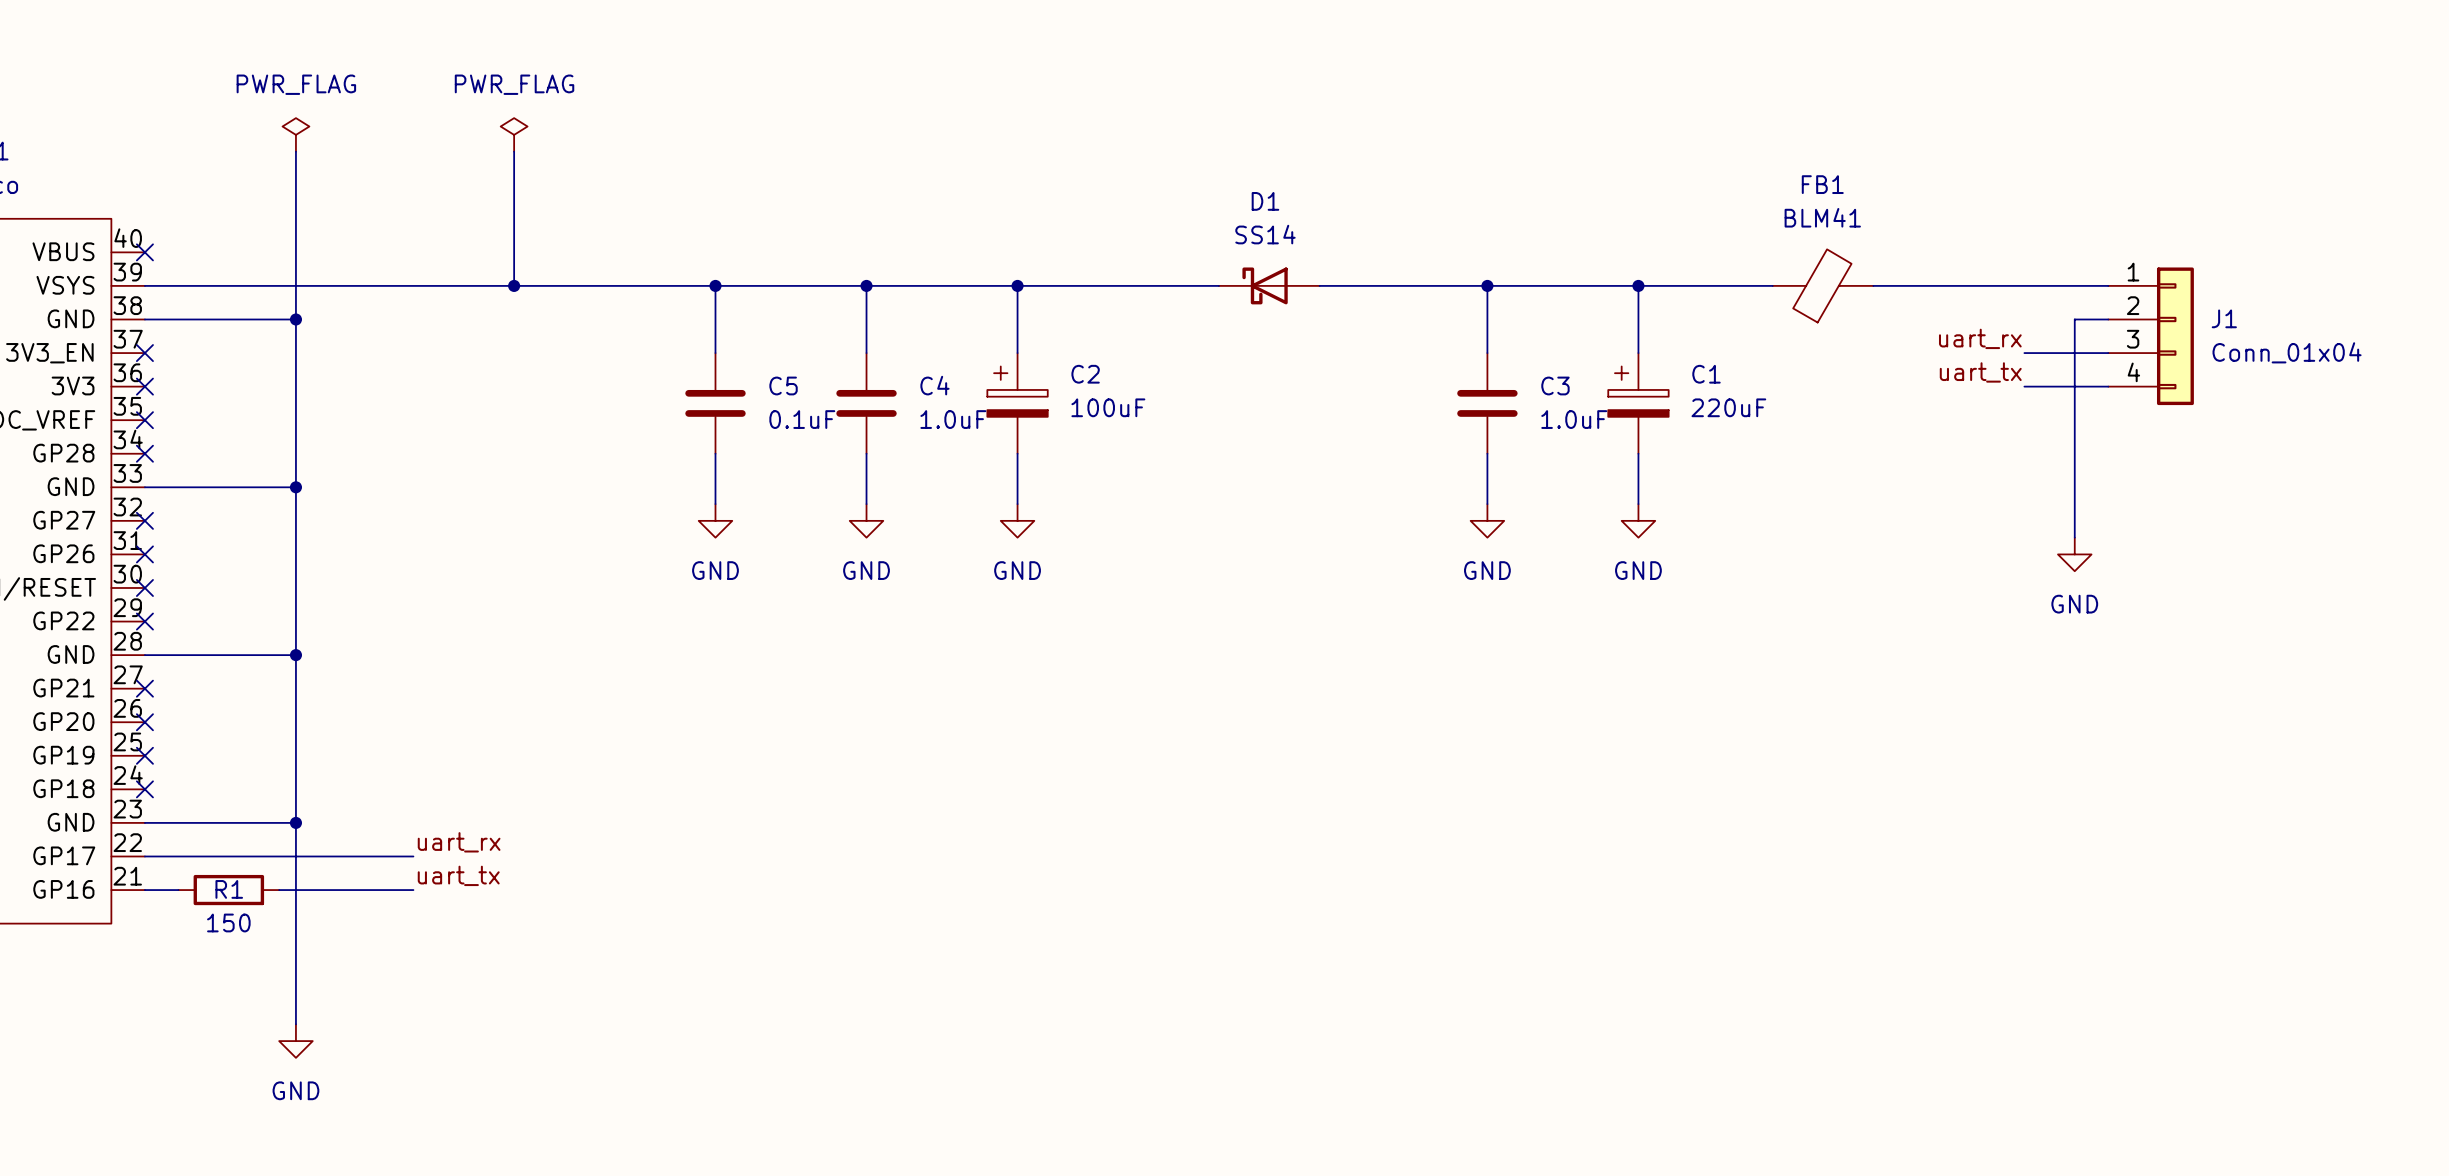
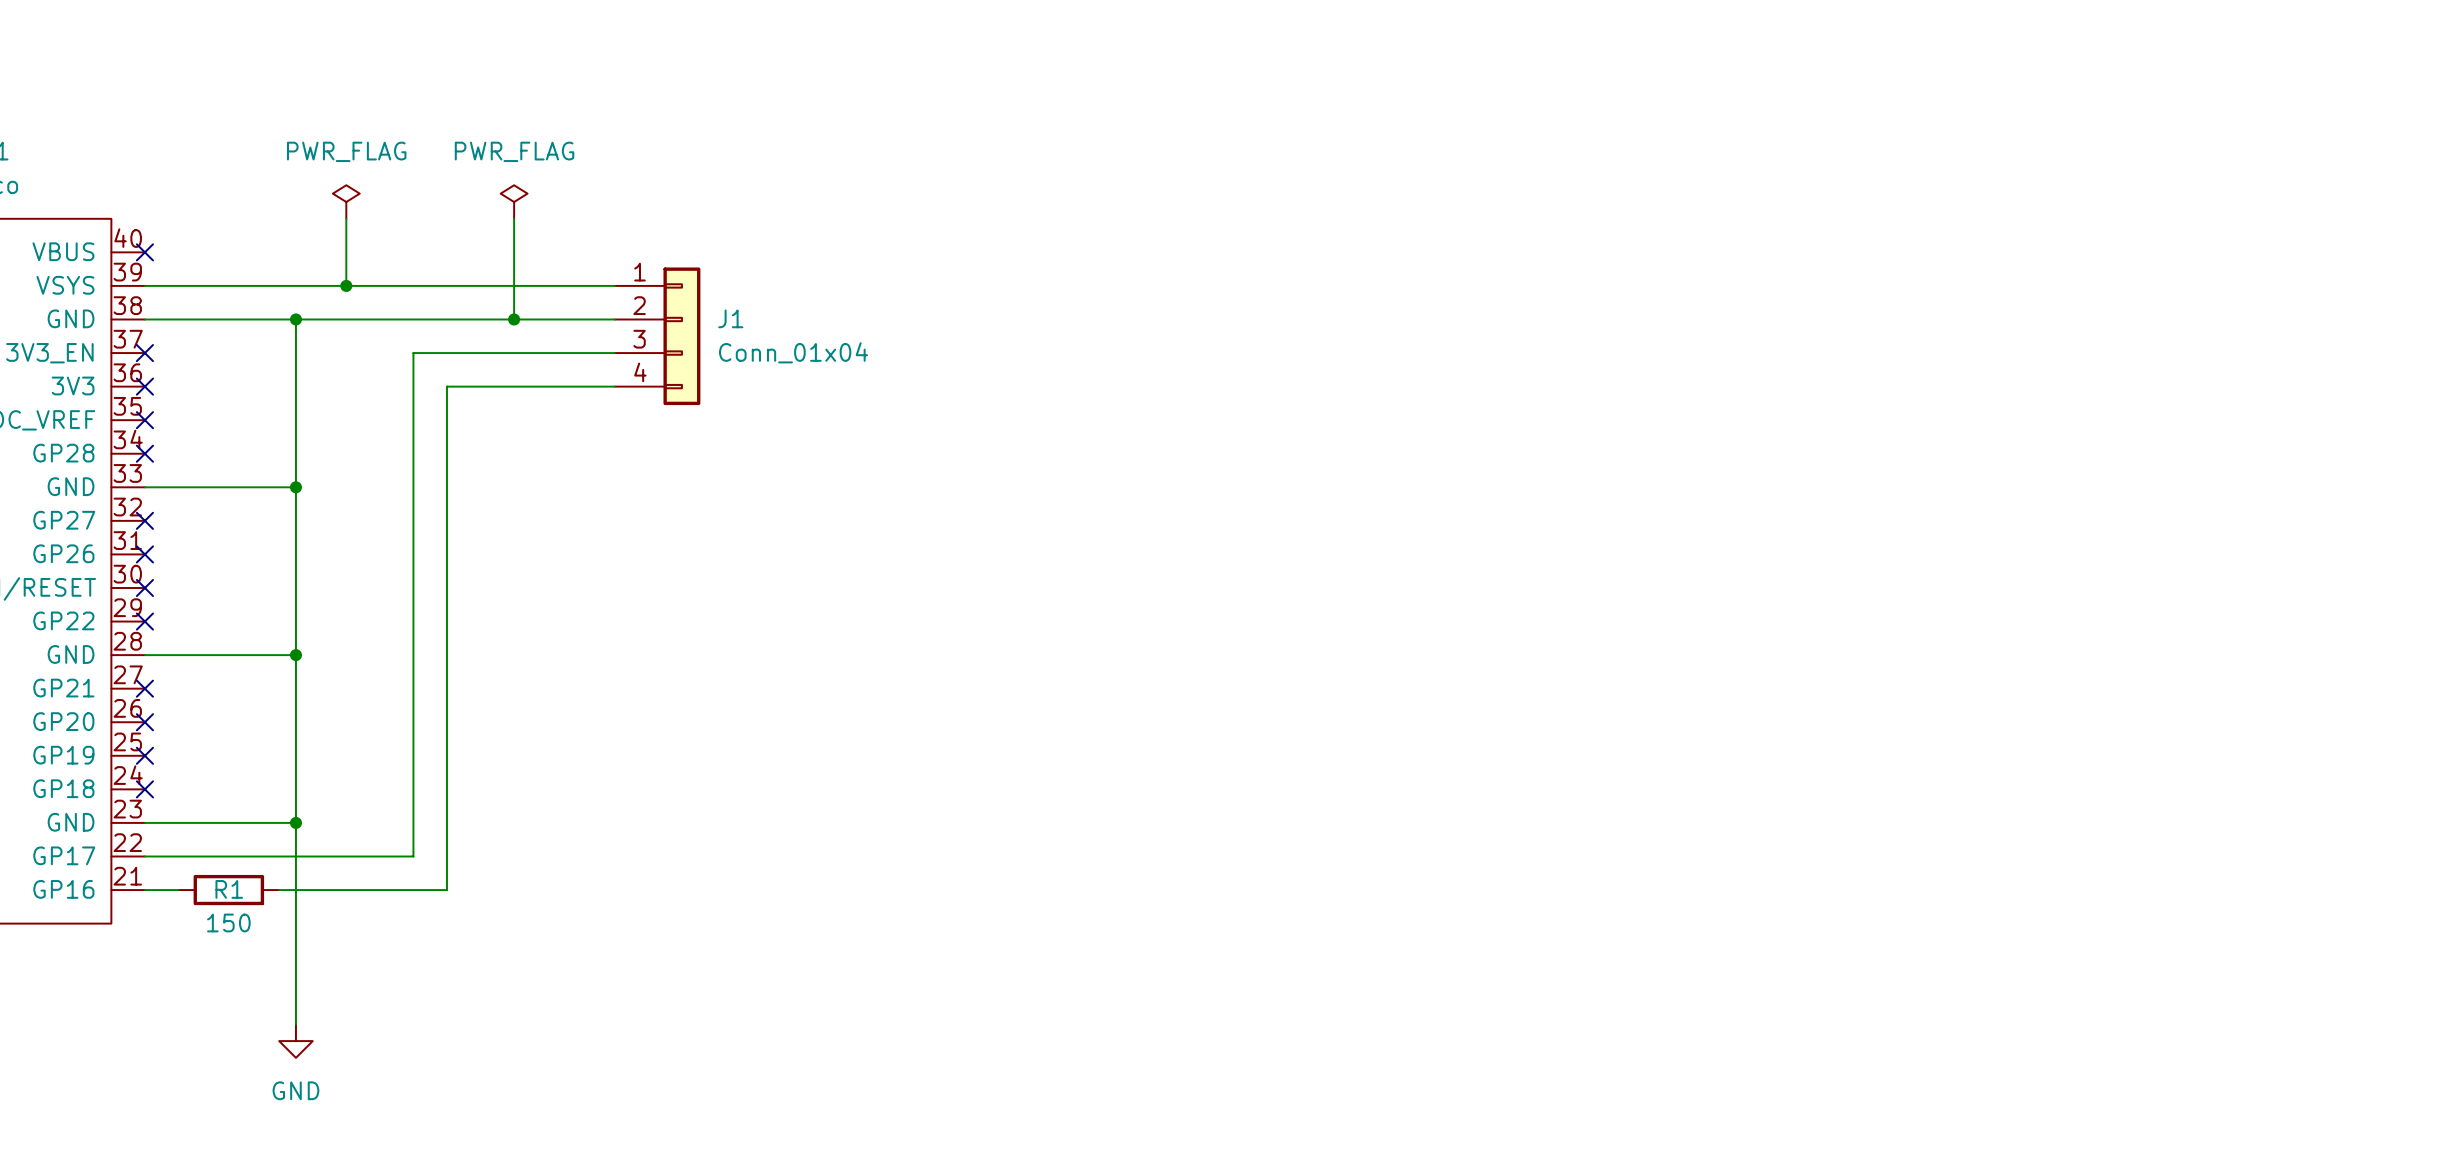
power symbol position: PWR_FLAG (295, 134) -> PWR_FLAG (346, 202)
power symbol position: PWR_FLAG (514, 134) -> PWR_FLAG (514, 202)
wire: (295, 151) (295, 319) -> (614, 319) (295, 319)
wire: (514, 151) (514, 218) -> (346, 218) (346, 285)
junction: none -> (346, 285)
wire: none -> (514, 285) (514, 319)
junction position: (514, 285) -> (514, 319)
wire: (614, 285) (1218, 285) -> none
wire: (715, 285) (715, 353) -> none
junction: (715, 285) -> none
wire: (866, 285) (866, 353) -> none
junction: (866, 285) -> none
wire: (1017, 285) (1017, 353) -> none
junction: (1017, 285) -> none
D1: SS14 (1269, 285) -> none
wire: (1319, 285) (1772, 285) -> none
wire: (1487, 285) (1487, 353) -> none
junction: (1487, 285) -> none
wire: (1638, 285) (1638, 353) -> none
junction: (1638, 285) -> none
FB1: BLM41 (1823, 285) -> none
wire: (1873, 285) (2108, 285) -> none
wire: (2108, 319) (2074, 319) (2074, 537) -> none
J1 position: (2151, 336) -> (657, 336)
label: uart_rx (1980, 338) -> none
wire: none -> (614, 353) (413, 353) (413, 856)
wire: (2024, 353) (2108, 353) -> none
label: uart_tx (1980, 372) -> none
wire: none -> (614, 386) (446, 386) (446, 890) (413, 890)
wire: (2024, 386) (2108, 386) -> none
C5: 0.1uF (715, 403) -> none
C4: 1.0uF (866, 403) -> none
C2: 100uF (1017, 403) -> none
C3: 1.0uF (1487, 403) -> none
C1: 220uF (1638, 403) -> none
wire: (715, 453) (715, 504) -> none
wire: (866, 453) (866, 504) -> none
wire: (1017, 453) (1017, 504) -> none
wire: (1487, 453) (1487, 504) -> none
wire: (1638, 453) (1638, 504) -> none
power symbol: GND (715, 520) -> none
power symbol: GND (866, 520) -> none
power symbol: GND (1017, 520) -> none
power symbol: GND (1487, 520) -> none
power symbol: GND (1638, 520) -> none
power symbol: GND (2074, 554) -> none
label: uart_rx (459, 842) -> none
label: uart_tx (458, 875) -> none

